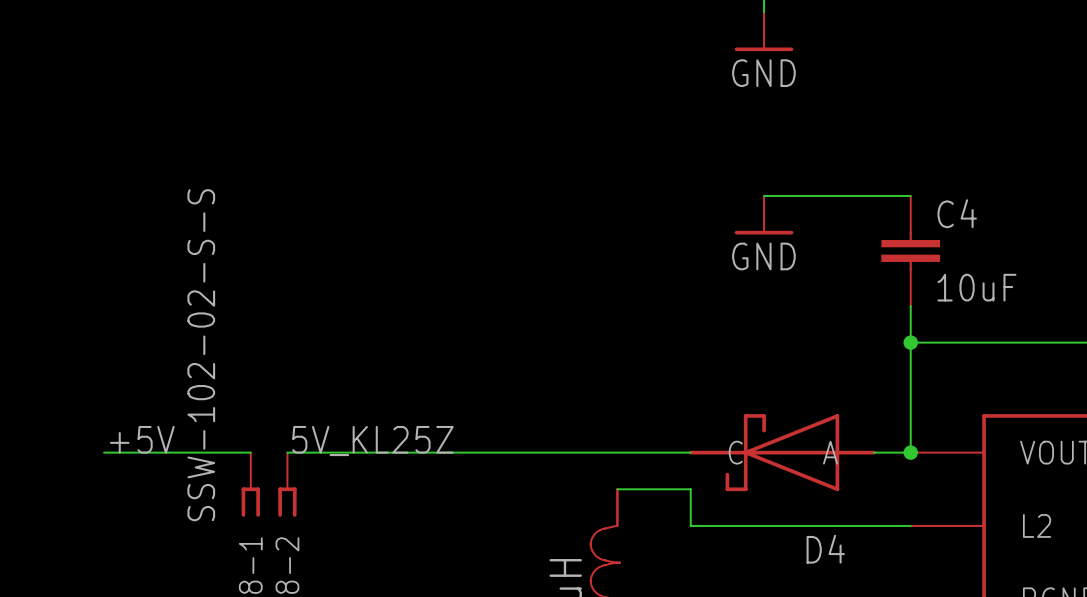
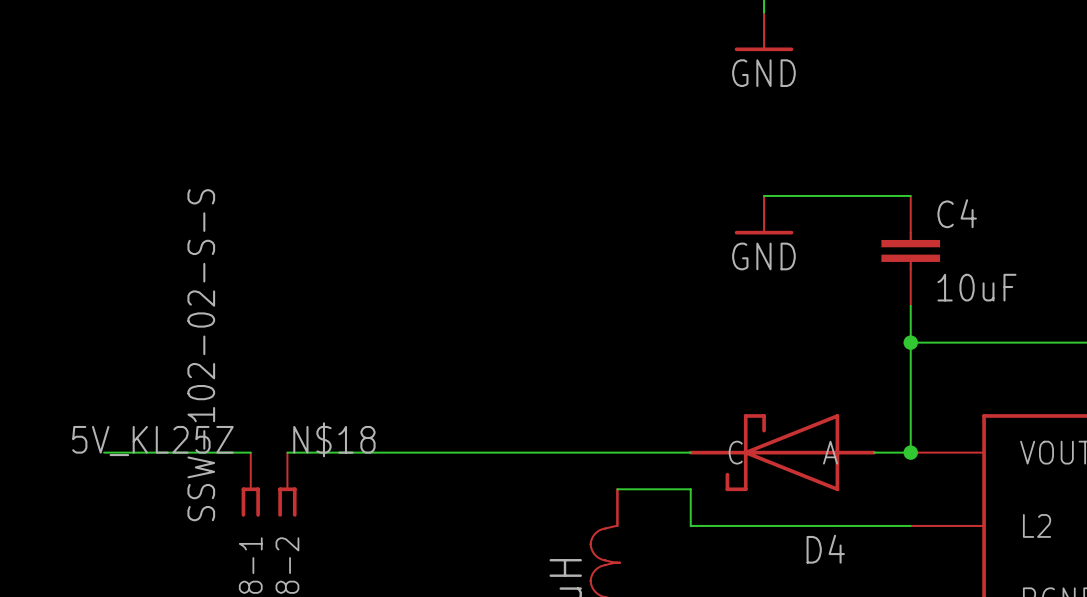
label: +5V (142, 439) -> none
label: none -> 5V_KL25Z (152, 441)
label: 5V_KL25Z (372, 441) -> N$18 (334, 439)

